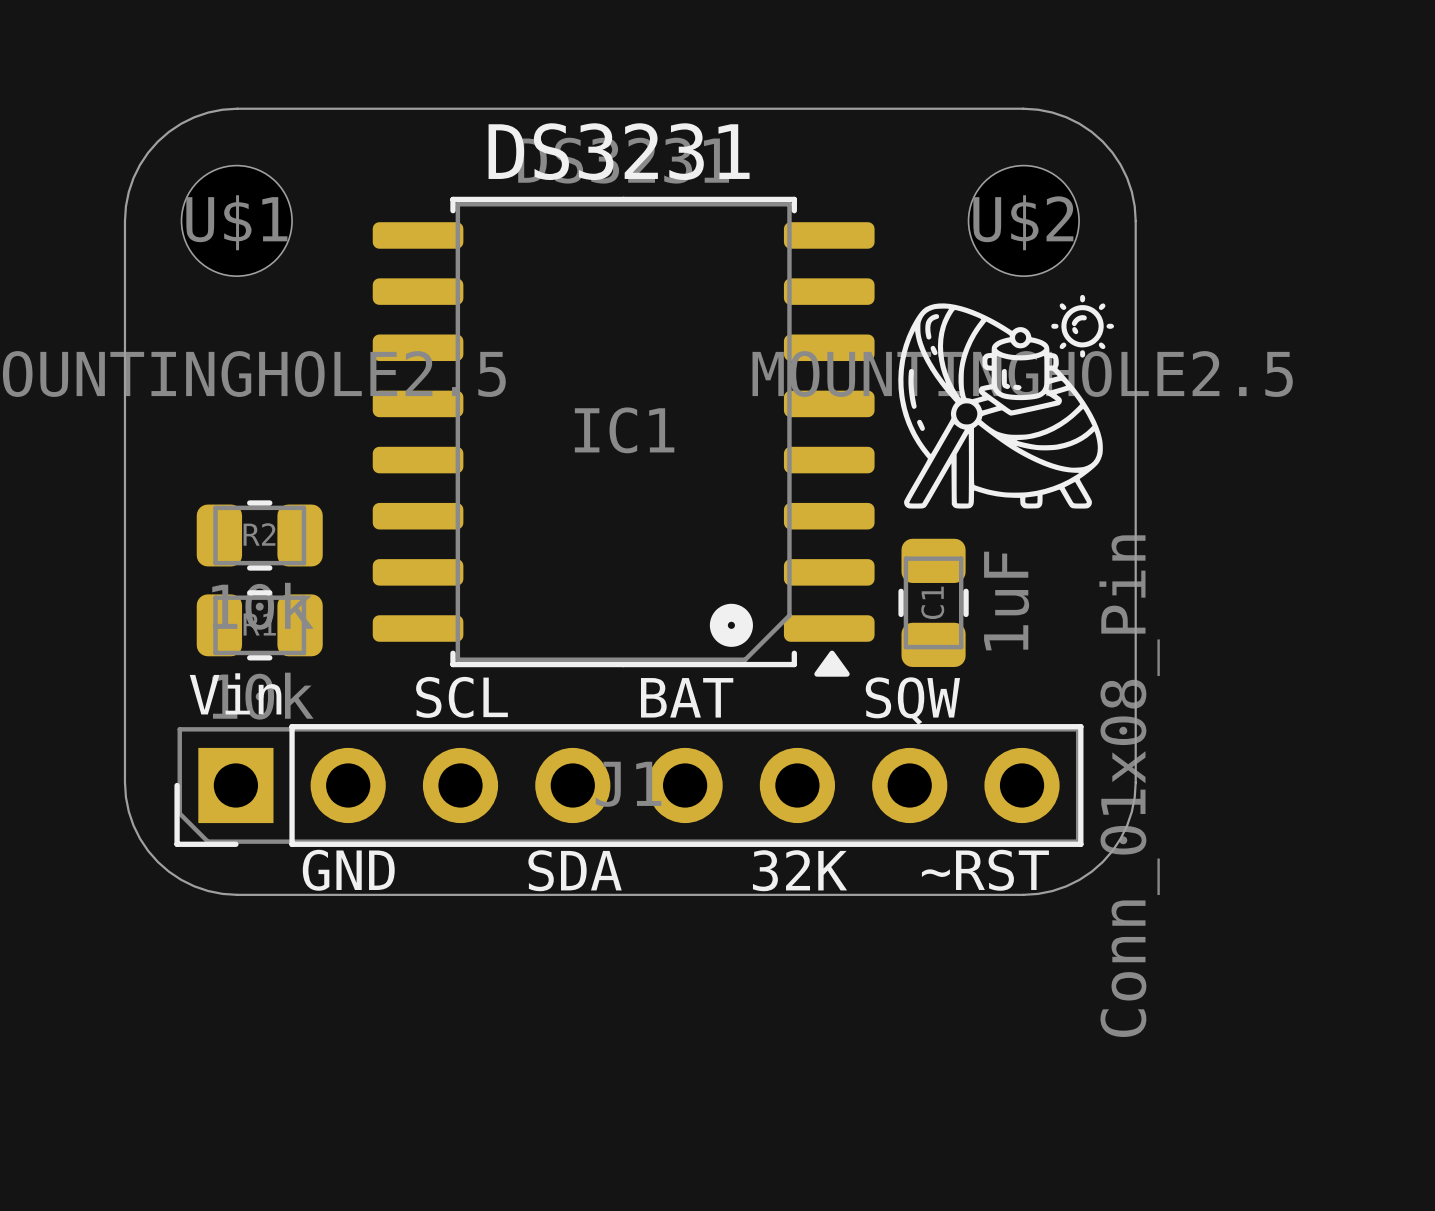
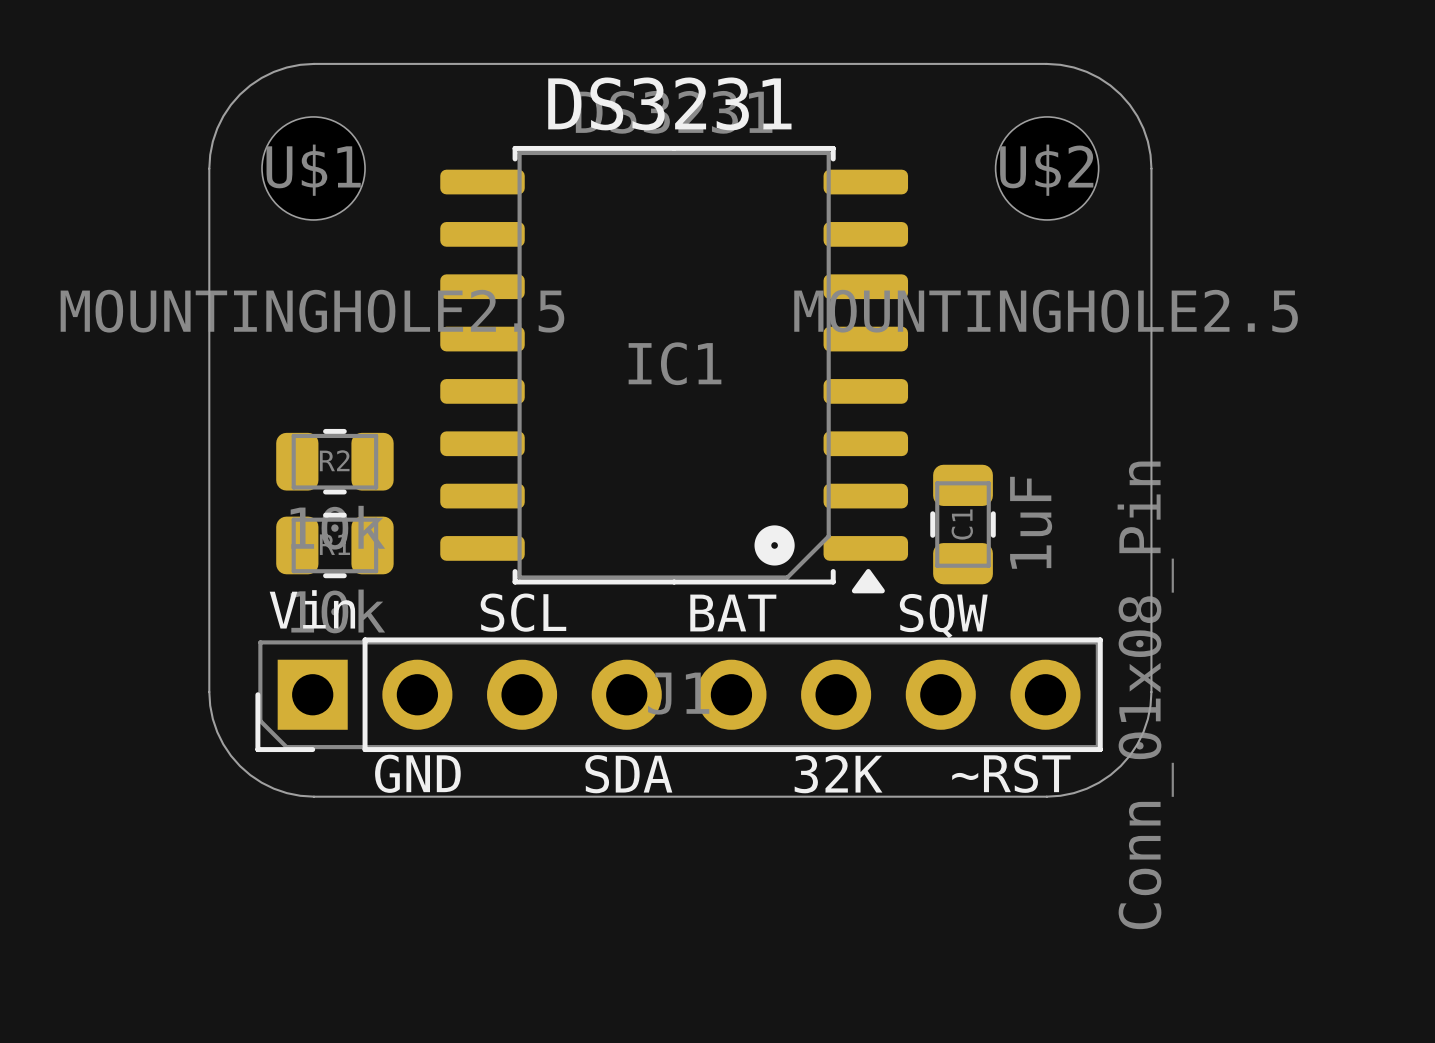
drawing: [898, 294, 1115, 509] -> none

